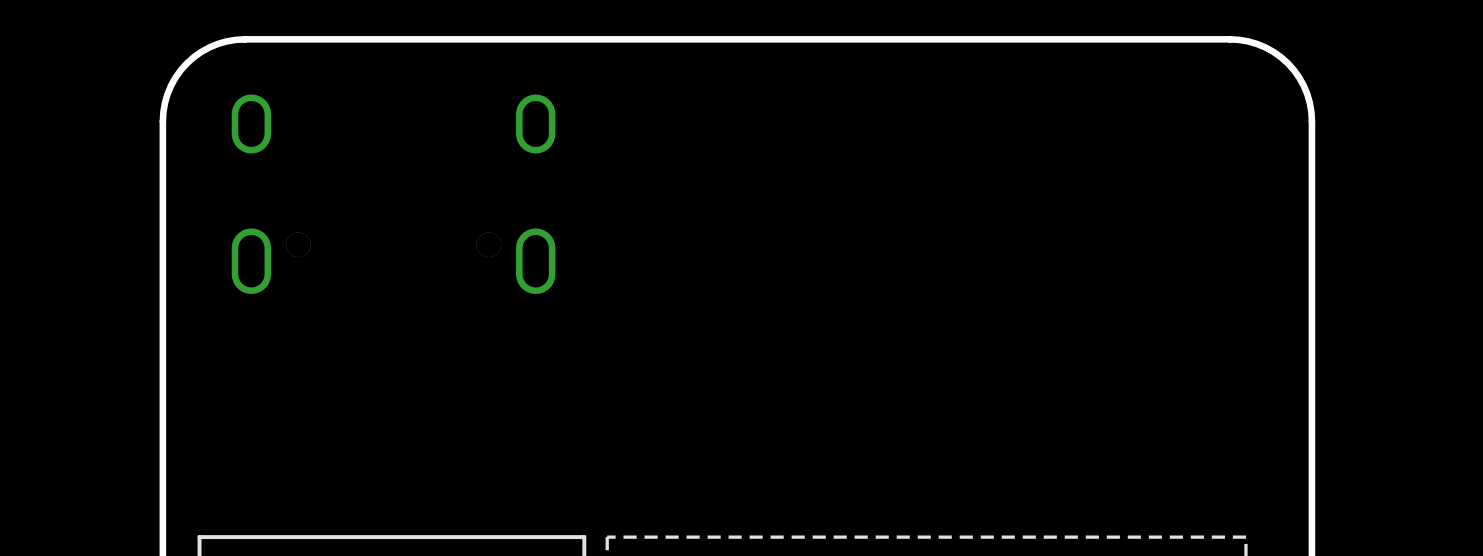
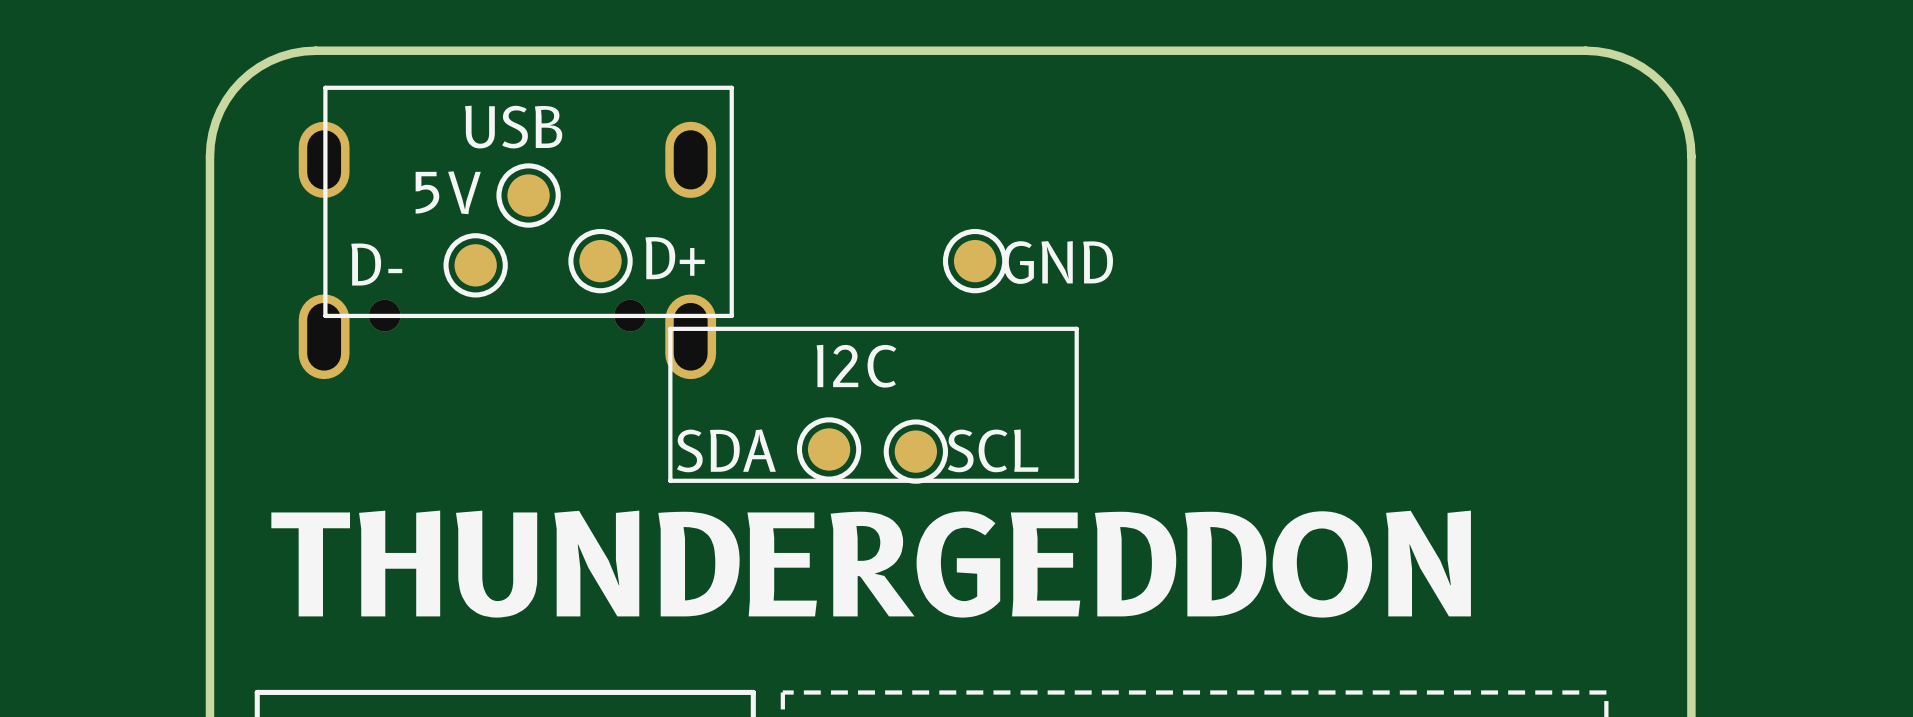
line: none -> (731, 87) (325, 87) (325, 315) (731, 315) (731, 87)
text: none -> USB (513, 127)
text: none -> 5V (448, 192)
part: none -> (528, 195)
text: none -> D+ (675, 258)
part: none -> (600, 261)
part: none -> (975, 261)
text: none -> GND (1057, 262)
text: none -> D- (376, 264)
part: none -> (475, 265)
line: none -> (1076, 328) (670, 328) (670, 480) (1076, 480) (1076, 328)
text: none -> I2C (856, 366)
part: none -> (829, 449)
text: none -> SDA (726, 450)
text: none -> SCL (993, 450)
part: none -> (915, 451)
text: none -> THUNDERGEDDON (871, 564)

